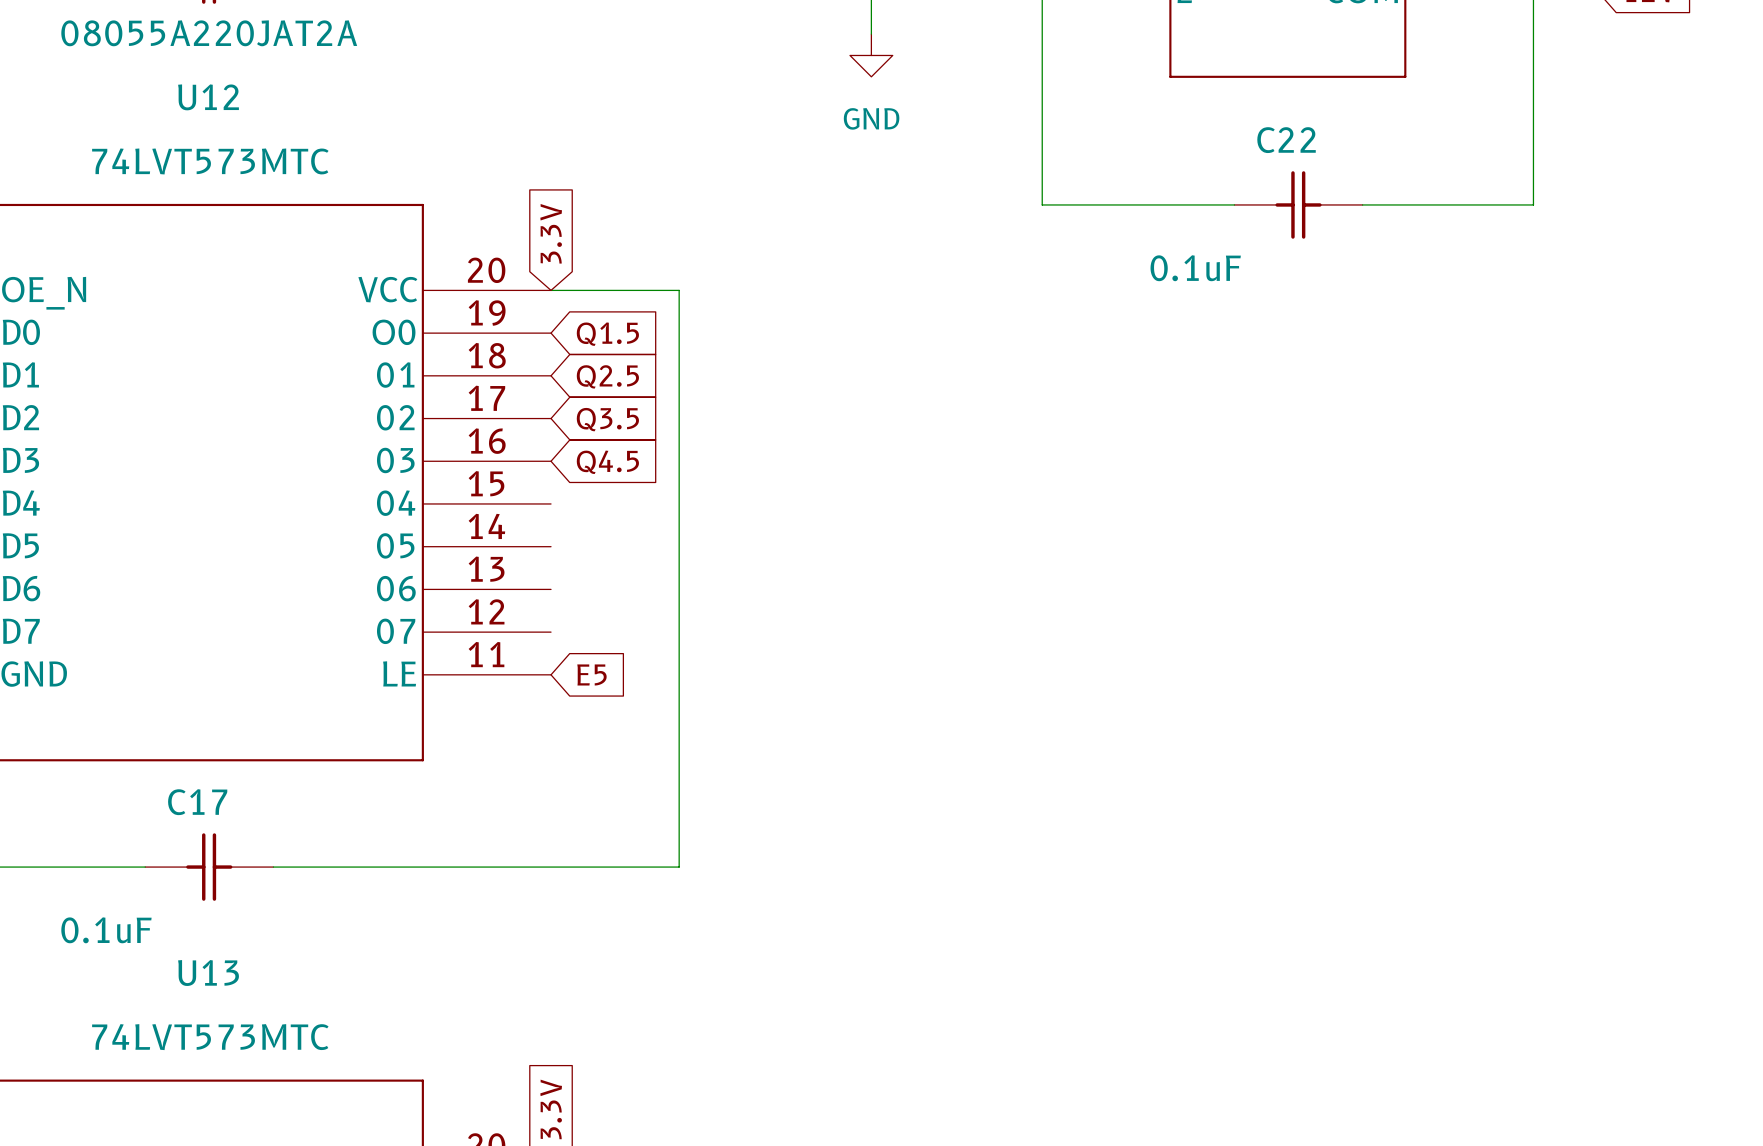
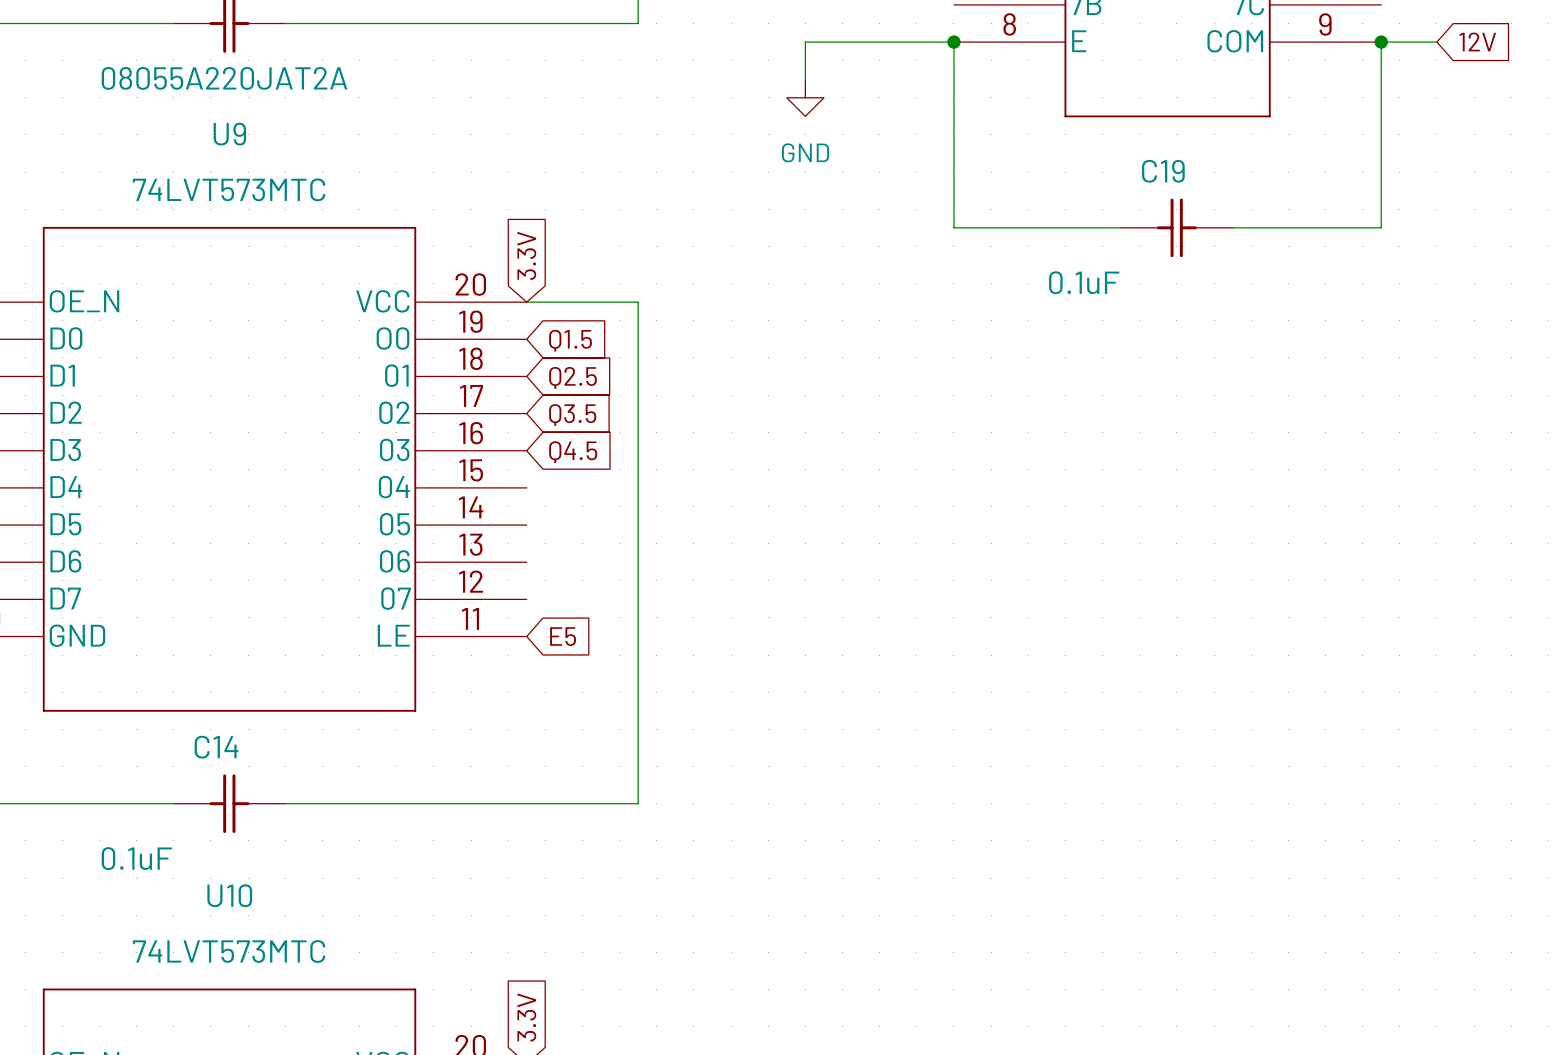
U12 name: U12 (208, 97) -> U9 (229, 134)
C22 name: C22 (1286, 140) -> C19 (1163, 171)
C17 name: C17 (197, 802) -> C14 (216, 747)
U13 name: U13 (208, 973) -> U10 (229, 895)

